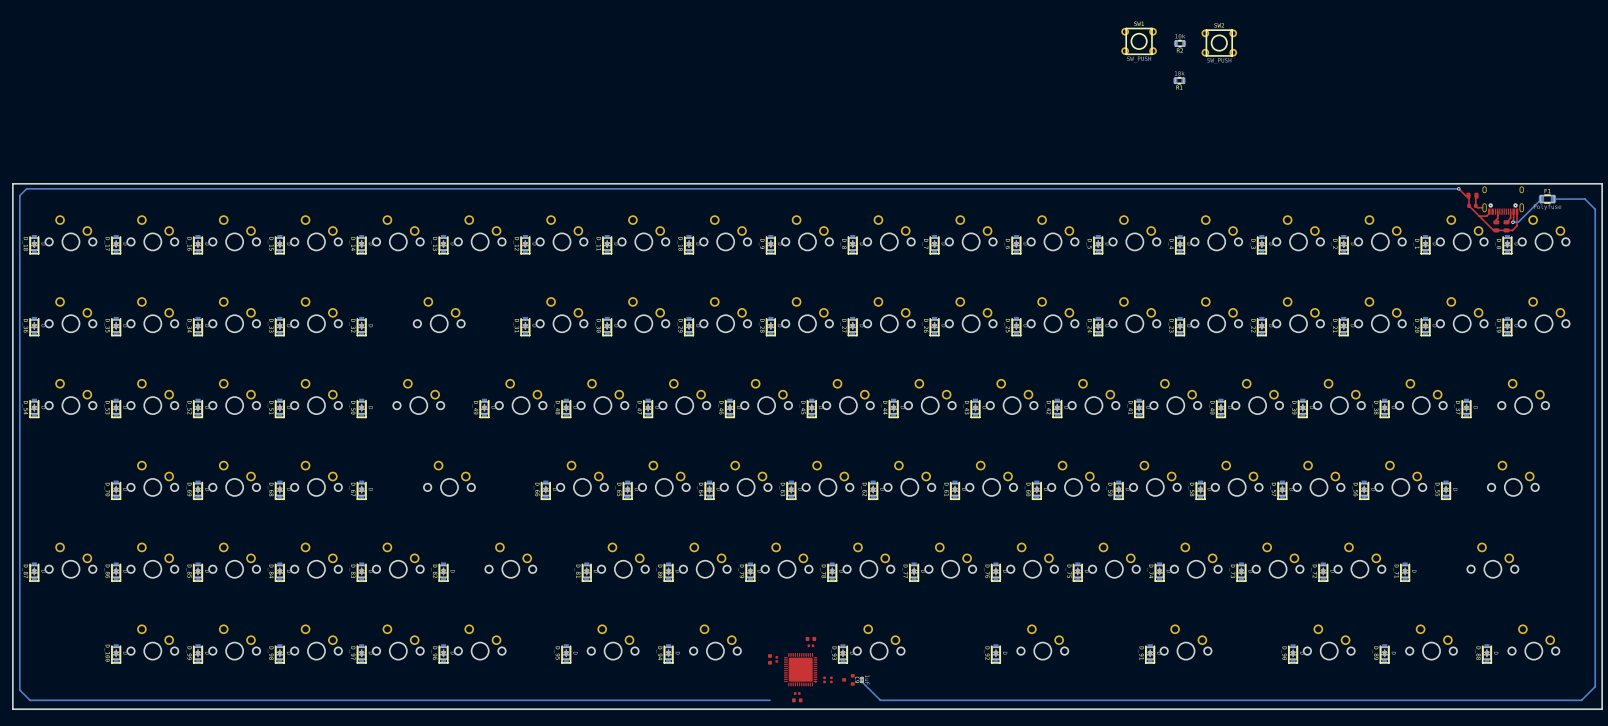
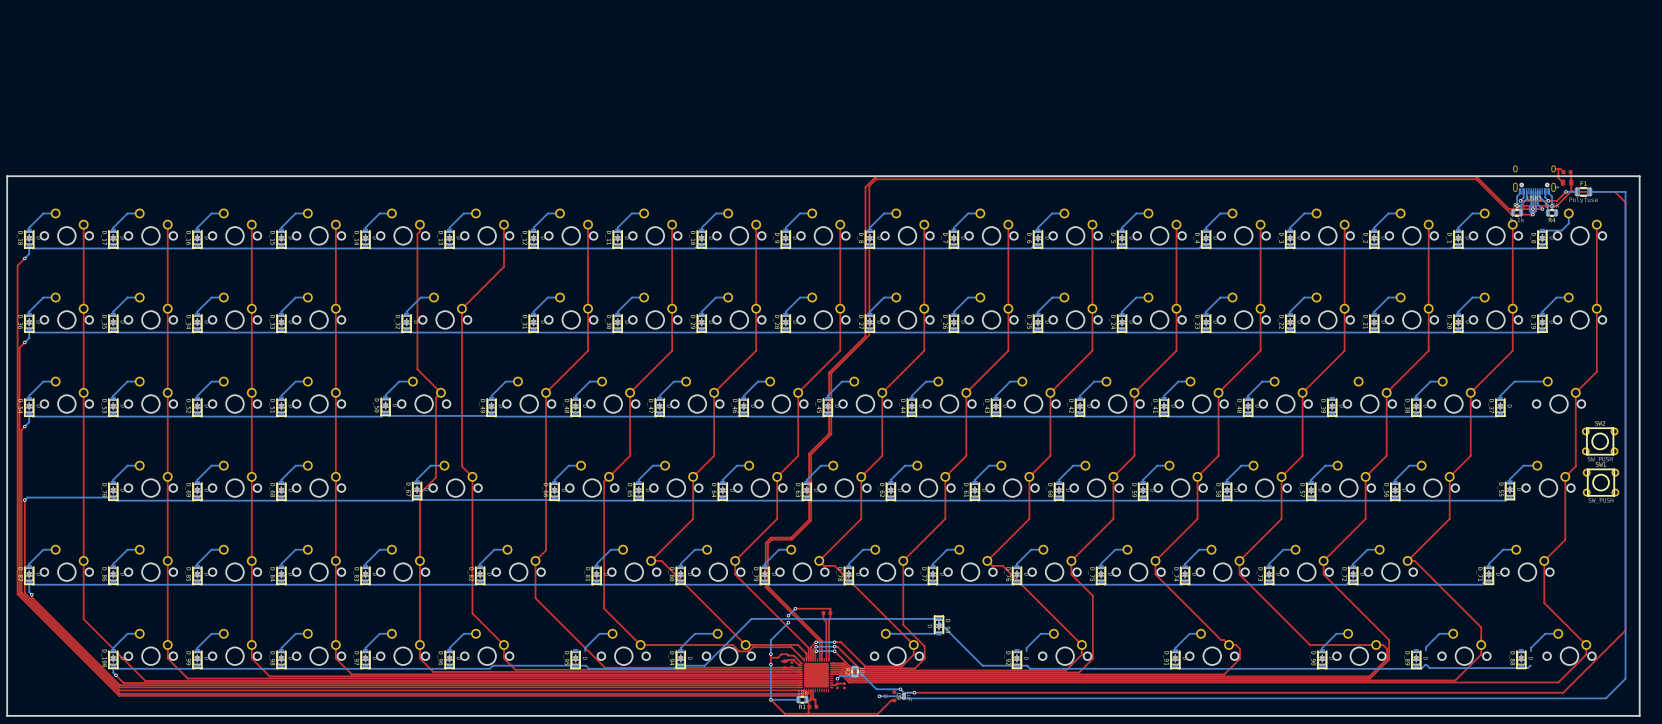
part position: (1139, 41) -> (1601, 482)
part rotation: 0° (1180, 43) -> 90° clockwise (854, 671)
part position: (1180, 43) -> (854, 671)
part position: (1219, 43) -> (1600, 441)
part position: (1179, 80) -> (802, 699)
top track: none -> (1553, 168) (1560, 168) (1563, 172)
top track: none -> (1558, 168) (1558, 178) (1562, 182)
top track: none -> (1570, 172) (1571, 191)
top track: (1458, 188) (1465, 195) (1468, 195) -> none
bottom track: (1458, 188) (26, 188) (19, 195) (19, 690) (30, 700) (770, 700) -> none
via: (1458, 188) -> none
bottom track: none -> (1558, 187) (1553, 187)
top track: (1469, 195) (1469, 205) -> none
part position: (1472, 195) -> (1567, 182)
top track: (1476, 195) (1475, 205) (1484, 207) -> none
bottom track: none -> (1520, 191) (1516, 196) (1516, 208) (1512, 212)
bottom track: none -> (1523, 191) (1523, 197) (1520, 200)
bottom track: none -> (1526, 191) (1526, 199) (1521, 205) (1521, 212)
bottom track: none -> (1533, 191) (1532, 209)
bottom track: none -> (1535, 191) (1536, 210) (1534, 212) (1529, 210) (1531, 191)
bottom track: none -> (1537, 191) (1537, 204) (1542, 209)
bottom track: none -> (1539, 191) (1539, 197) (1547, 204) (1547, 212)
bottom track: none -> (1545, 191) (1545, 197) (1548, 200)
bottom track: none -> (1548, 191) (1551, 196) (1551, 208) (1556, 212)
top track: none -> (1571, 191) (1556, 205) (1516, 205)
top track: none -> (1571, 191) (1615, 191) (1625, 202) (1625, 630) (1563, 692) (914, 692)
top track: none -> (1565, 191) (1557, 200) (1520, 200)
via: none -> (1565, 191)
bottom track: (1541, 199) (1518, 222) (1512, 222) -> (1577, 191) (1565, 191)
bottom track: (1584, 199) (1595, 209) (1595, 686) (1581, 700) (880, 700) (862, 681) -> (1622, 191) (1625, 191) (1625, 678) (1605, 698) (902, 698) (900, 696) (879, 696)
part side: top (1503, 200) -> bottom (1534, 179)
top track: (1469, 205) (1493, 230) (1512, 230) (1516, 225) (1516, 211) -> none
part position: (1472, 205) -> (1567, 172)
via: none -> (1520, 200)
via: none -> (1548, 200)
top track: (1510, 211) (1510, 218) (1506, 222) -> none
top track: (1513, 211) (1512, 222) -> none
via: none -> (1516, 205)
via: none -> (1551, 205)
via: none -> (1532, 209)
top track: none -> (1542, 209) (1508, 209) (1476, 176) (876, 176) (865, 187) (865, 336) (829, 372) (829, 433) (809, 453) (809, 519) (791, 537) (771, 537) (765, 542) (765, 587) (819, 641) (819, 660)
via: none -> (1542, 209)
bottom track: none -> (55, 213) (43, 213) (29, 227) (29, 230)
bottom track: none -> (139, 213) (127, 213) (113, 227) (113, 230)
bottom track: none -> (223, 213) (211, 213) (197, 227) (197, 230)
bottom track: none -> (307, 213) (295, 213) (281, 227) (281, 230)
bottom track: none -> (391, 213) (379, 213) (365, 227) (365, 230)
bottom track: none -> (475, 213) (463, 213) (449, 227) (449, 230)
bottom track: none -> (560, 213) (547, 213) (533, 227) (533, 230)
bottom track: none -> (644, 213) (631, 213) (617, 227) (617, 230)
bottom track: none -> (728, 213) (715, 213) (701, 227) (701, 230)
bottom track: none -> (812, 213) (800, 213) (785, 227) (785, 230)
bottom track: none -> (896, 213) (884, 213) (869, 227) (869, 230)
bottom track: none -> (980, 213) (968, 213) (953, 227) (953, 230)
bottom track: none -> (1064, 213) (1052, 213) (1038, 227) (1038, 230)
bottom track: none -> (1148, 213) (1136, 213) (1122, 227) (1122, 230)
bottom track: none -> (1232, 213) (1220, 213) (1206, 227) (1206, 230)
bottom track: none -> (1316, 213) (1304, 213) (1290, 227) (1290, 230)
bottom track: none -> (1400, 213) (1388, 213) (1374, 227) (1374, 230)
bottom track: none -> (1484, 213) (1472, 213) (1458, 227) (1458, 230)
bottom track: none -> (1568, 213) (1568, 223) (1561, 230) (1542, 230)
top track: none -> (1532, 214) (1511, 214) (1476, 179) (876, 179) (869, 186) (869, 335) (831, 373) (831, 434) (811, 454) (811, 520) (792, 539) (771, 539) (767, 543) (767, 586) (821, 640) (821, 660)
via: none -> (1532, 214)
via: (1512, 222) -> none
part side: top (1496, 226) -> bottom (1551, 212)
part side: top (1506, 226) -> bottom (1516, 212)
top track: none -> (83, 224) (83, 619) (145, 680) (801, 680)
top track: none -> (167, 224) (167, 658) (187, 678) (801, 678)
top track: none -> (251, 224) (251, 658) (269, 676) (801, 676)
top track: none -> (335, 224) (335, 658) (351, 674) (801, 674)
top track: none -> (419, 224) (419, 231) (417, 234) (417, 369) (440, 392) (435, 397) (435, 477) (419, 493) (419, 658) (433, 671) (801, 671)
top track: none -> (503, 224) (503, 266) (461, 308) (461, 466) (472, 476) (472, 613) (503, 644) (503, 658) (515, 669) (801, 669)
top track: none -> (588, 224) (588, 350) (546, 392) (546, 550) (535, 560) (535, 598) (605, 667) (801, 667)
top track: none -> (672, 224) (672, 350) (630, 392) (630, 455) (604, 481) (604, 608) (640, 644) (732, 644) (739, 651) (748, 651) (752, 647) (791, 647) (804, 660)
top track: none -> (756, 224) (756, 350) (714, 392) (714, 455) (693, 476) (693, 518) (651, 560) (661, 560) (745, 644) (797, 644) (806, 653) (806, 660)
top track: none -> (840, 224) (840, 350) (798, 392) (798, 455) (777, 476) (777, 518) (735, 560) (735, 574) (808, 647) (808, 660)
top track: none -> (924, 224) (924, 350) (882, 392) (882, 455) (861, 476) (861, 518) (819, 560) (824, 565) (834, 565) (913, 644) (913, 654) (901, 666) (865, 666) (841, 642) (834, 642)
top track: none -> (1008, 224) (1008, 350) (966, 392) (966, 455) (945, 476) (945, 518) (903, 560) (903, 625) (924, 646) (924, 658) (915, 668) (859, 668) (837, 646) (834, 646)
top track: none -> (1092, 224) (1092, 350) (1050, 392) (1050, 455) (1029, 476) (1029, 518) (987, 560) (992, 565) (1002, 565) (1081, 644) (1081, 654) (1066, 670) (853, 670) (834, 651)
top track: none -> (1176, 224) (1176, 350) (1134, 392) (1134, 455) (1113, 476) (1113, 518) (1071, 560) (1071, 574) (1092, 595) (1092, 658) (1079, 672) (853, 672) (843, 663) (831, 663)
top track: none -> (1260, 224) (1260, 350) (1218, 392) (1218, 455) (1197, 476) (1197, 518) (1155, 560) (1155, 574) (1221, 640) (1224, 640) (1229, 644) (1236, 644) (1239, 648) (1239, 658) (1224, 674) (852, 674) (843, 665) (831, 665)
top track: none -> (1344, 224) (1344, 350) (1302, 392) (1302, 455) (1281, 476) (1281, 518) (1239, 560) (1239, 574) (1310, 644) (1383, 644) (1387, 648) (1387, 658) (1369, 676) (851, 676) (842, 667) (831, 667)
top track: none -> (1428, 224) (1428, 350) (1386, 392) (1386, 455) (1365, 476) (1365, 518) (1323, 560) (1323, 574) (1389, 639) (1389, 659) (1370, 678) (850, 678) (841, 669) (831, 669)
top track: none -> (1512, 224) (1512, 350) (1470, 392) (1470, 455) (1449, 476) (1449, 518) (1407, 560) (1414, 560) (1481, 627) (1481, 654) (1455, 680) (849, 680) (841, 671) (831, 671)
top track: none -> (1596, 224) (1596, 371) (1575, 392) (1575, 466) (1565, 476) (1565, 539) (1544, 560) (1544, 602) (1586, 644) (1586, 654) (1558, 682) (848, 682) (840, 674) (831, 674)
bottom track: none -> (1542, 245) (1538, 248) (1462, 248) (1458, 245) (1454, 245) (1451, 248) (1378, 248) (1374, 245) (1370, 248) (1293, 248) (1290, 245) (1286, 248) (1209, 248) (1206, 245) (1202, 245) (1199, 248) (1125, 248) (1122, 245) (1118, 248) (1041, 248) (1038, 245) (1034, 245) (1031, 248) (957, 248) (954, 245) (950, 248) (873, 248) (870, 245) (866, 248) (789, 248) (786, 245) (782, 248) (705, 248) (702, 245) (697, 245) (694, 248) (621, 248) (618, 245) (613, 248) (537, 248) (534, 245) (529, 248) (453, 248) (450, 245) (445, 248) (369, 248) (366, 245) (361, 248) (285, 248) (282, 245) (277, 248) (201, 248) (198, 245) (193, 248) (117, 248) (113, 245) (109, 248) (33, 248) (29, 245) (29, 254) (24, 258)
top track: none -> (24, 258) (17, 265) (17, 594) (119, 695) (806, 695) (808, 690)
via: none -> (24, 258)
bottom track: none -> (55, 297) (43, 297) (29, 311) (29, 314)
bottom track: none -> (139, 297) (127, 297) (113, 311) (113, 314)
bottom track: none -> (223, 297) (211, 297) (197, 311) (197, 314)
bottom track: none -> (307, 297) (295, 297) (281, 311) (281, 314)
bottom track: none -> (433, 297) (420, 297) (406, 311) (406, 314)
bottom track: none -> (560, 297) (547, 297) (533, 311) (533, 314)
bottom track: none -> (644, 297) (631, 297) (617, 311) (617, 314)
bottom track: none -> (728, 297) (715, 297) (701, 311) (701, 314)
bottom track: none -> (812, 297) (800, 297) (785, 311) (785, 314)
bottom track: none -> (896, 297) (884, 297) (869, 311) (869, 314)
bottom track: none -> (980, 297) (968, 297) (953, 311) (953, 314)
bottom track: none -> (1064, 297) (1052, 297) (1038, 311) (1038, 314)
bottom track: none -> (1148, 297) (1136, 297) (1122, 311) (1122, 314)
bottom track: none -> (1232, 297) (1220, 297) (1206, 311) (1206, 314)
bottom track: none -> (1316, 297) (1304, 297) (1290, 311) (1290, 314)
bottom track: none -> (1400, 297) (1388, 297) (1374, 311) (1374, 314)
bottom track: none -> (1484, 297) (1472, 297) (1458, 311) (1458, 314)
bottom track: none -> (1568, 297) (1556, 297) (1542, 311) (1542, 314)
part position: (361, 326) -> (406, 322)
bottom track: none -> (1542, 329) (1538, 332) (1462, 332) (1458, 329) (1454, 332) (1378, 332) (1374, 329) (1370, 332) (1293, 332) (1290, 329) (1286, 332) (1209, 332) (1206, 329) (1202, 332) (1125, 332) (1122, 329) (1118, 332) (1041, 332) (1038, 329) (1034, 332) (957, 332) (954, 329) (950, 332) (873, 332) (870, 329) (866, 332) (789, 332) (786, 329) (782, 332) (705, 332) (702, 329) (697, 332) (621, 332) (618, 329) (613, 332) (537, 332) (534, 329) (529, 332) (410, 332) (407, 329) (402, 332) (285, 332) (282, 329) (277, 332) (201, 332) (198, 329) (193, 332) (117, 332) (113, 329) (109, 332) (33, 332) (29, 329) (29, 338) (24, 342)
top track: none -> (24, 342) (19, 347) (19, 593) (119, 693) (805, 693) (806, 690)
via: none -> (24, 342)
bottom track: none -> (55, 381) (43, 381) (29, 395) (29, 398)
bottom track: none -> (139, 381) (127, 381) (113, 395) (113, 398)
bottom track: none -> (223, 381) (211, 381) (197, 395) (197, 398)
bottom track: none -> (307, 381) (295, 381) (281, 395) (281, 398)
bottom track: none -> (412, 381) (399, 381) (385, 395) (385, 398)
bottom track: none -> (518, 381) (505, 381) (491, 395) (491, 398)
bottom track: none -> (602, 381) (589, 381) (575, 395) (575, 398)
bottom track: none -> (686, 381) (673, 381) (659, 395) (659, 398)
bottom track: none -> (770, 381) (758, 381) (743, 395) (743, 398)
bottom track: none -> (854, 381) (842, 381) (827, 395) (827, 398)
bottom track: none -> (938, 381) (926, 381) (911, 395) (911, 398)
bottom track: none -> (1022, 381) (1010, 381) (995, 395) (995, 398)
bottom track: none -> (1106, 381) (1094, 381) (1080, 395) (1080, 398)
bottom track: none -> (1190, 381) (1178, 381) (1164, 395) (1164, 398)
bottom track: none -> (1274, 381) (1262, 381) (1248, 395) (1248, 398)
bottom track: none -> (1442, 381) (1430, 381) (1416, 395) (1416, 398)
bottom track: none -> (1547, 381) (1514, 381) (1500, 395) (1500, 398)
part position: (361, 408) -> (385, 406)
bottom track: none -> (1500, 413) (1496, 416) (1420, 416) (1416, 413) (1412, 416) (1335, 416) (1332, 413) (1328, 416) (1251, 416) (1248, 413) (1244, 416) (1167, 416) (1164, 413) (1160, 416) (1083, 416) (1080, 413) (1076, 416) (999, 416) (996, 413) (992, 416) (915, 416) (912, 413) (908, 416) (831, 416) (828, 413) (824, 416) (747, 416) (744, 413) (740, 416) (663, 416) (660, 413) (655, 416) (579, 416) (576, 413) (571, 416) (495, 416) (492, 413) (488, 415) (389, 415) (386, 412) (381, 416) (285, 416) (282, 413) (277, 416) (201, 416) (198, 413) (193, 416) (117, 416) (113, 413) (109, 416) (33, 416) (29, 413) (29, 422) (24, 426)
top track: none -> (24, 426) (21, 429) (21, 592) (119, 690) (804, 690)
via: none -> (24, 426)
bottom track: none -> (139, 465) (127, 465) (113, 479) (113, 483)
bottom track: none -> (223, 465) (211, 465) (197, 479) (197, 483)
bottom track: none -> (307, 465) (295, 465) (281, 479) (281, 483)
bottom track: none -> (444, 465) (430, 465) (417, 479) (417, 482)
bottom track: none -> (581, 465) (568, 465) (554, 479) (554, 483)
bottom track: none -> (665, 465) (652, 465) (638, 479) (638, 483)
bottom track: none -> (749, 465) (737, 465) (722, 479) (722, 483)
bottom track: none -> (833, 465) (821, 465) (806, 479) (806, 483)
bottom track: none -> (917, 465) (905, 465) (890, 479) (890, 483)
bottom track: none -> (1001, 465) (989, 465) (974, 479) (974, 483)
bottom track: none -> (1085, 465) (1073, 465) (1059, 479) (1059, 483)
bottom track: none -> (1169, 465) (1157, 465) (1143, 479) (1143, 483)
bottom track: none -> (1253, 465) (1241, 465) (1227, 479) (1227, 483)
bottom track: none -> (1337, 465) (1325, 465) (1311, 479) (1311, 483)
bottom track: none -> (1421, 465) (1409, 465) (1395, 479) (1395, 483)
bottom track: none -> (1537, 465) (1523, 465) (1509, 479) (1509, 482)
part position: (361, 490) -> (417, 490)
part position: (1446, 490) -> (1509, 490)
bottom track: none -> (1509, 496) (1505, 500) (1399, 500) (1395, 497) (1391, 500) (1314, 500) (1311, 497) (1307, 500) (1230, 500) (1227, 497) (1223, 500) (1146, 500) (1143, 497) (1139, 500) (1062, 500) (1059, 497) (1055, 500) (978, 500) (975, 497) (971, 500) (894, 500) (891, 497) (887, 500) (810, 500) (807, 497) (803, 500) (726, 500) (723, 497) (719, 500) (642, 500) (639, 497) (634, 500) (558, 500) (555, 497) (551, 500) (420, 500) (417, 496) (412, 500) (285, 500) (282, 497) (277, 500) (201, 500) (198, 497) (193, 500) (117, 500) (113, 497) (27, 497) (24, 500)
top track: none -> (24, 500) (24, 593) (119, 687) (801, 687)
via: none -> (24, 500)
bottom track: none -> (55, 549) (43, 549) (29, 563) (29, 567)
bottom track: none -> (139, 549) (127, 549) (113, 563) (113, 567)
bottom track: none -> (223, 549) (211, 549) (197, 563) (197, 567)
bottom track: none -> (307, 549) (295, 549) (281, 563) (281, 567)
bottom track: none -> (391, 549) (379, 549) (365, 563) (365, 567)
bottom track: none -> (507, 549) (494, 549) (480, 563) (480, 567)
bottom track: none -> (623, 549) (610, 549) (596, 563) (596, 567)
bottom track: none -> (707, 549) (694, 549) (680, 563) (680, 567)
bottom track: none -> (791, 549) (779, 549) (764, 563) (764, 567)
bottom track: none -> (875, 549) (863, 549) (848, 563) (848, 567)
bottom track: none -> (959, 549) (947, 549) (932, 563) (932, 567)
bottom track: none -> (1043, 549) (1031, 549) (1016, 563) (1016, 567)
bottom track: none -> (1127, 549) (1115, 549) (1101, 563) (1101, 567)
bottom track: none -> (1211, 549) (1199, 549) (1185, 563) (1185, 567)
bottom track: none -> (1295, 549) (1283, 549) (1269, 563) (1269, 567)
bottom track: none -> (1379, 549) (1367, 549) (1353, 563) (1353, 567)
bottom track: none -> (1516, 549) (1503, 549) (1488, 563) (1488, 567)
part position: (443, 571) -> (480, 574)
part position: (1405, 571) -> (1488, 574)
bottom track: none -> (1488, 581) (1485, 581) (1482, 584) (1357, 584) (1353, 581) (1349, 581) (1346, 584) (1272, 584) (1269, 581) (1265, 584) (1188, 584) (1185, 581) (1181, 584) (1104, 584) (1101, 581) (1097, 584) (1020, 584) (1017, 581) (1013, 584) (936, 584) (933, 581) (929, 584) (852, 584) (849, 581) (845, 584) (768, 584) (765, 581) (761, 584) (684, 584) (681, 581) (676, 584) (600, 584) (597, 581) (592, 584) (483, 584) (480, 581) (476, 584) (369, 584) (366, 581) (361, 584) (285, 584) (282, 581) (277, 584) (201, 584) (198, 581) (193, 584) (117, 584) (113, 581) (109, 584) (33, 584) (29, 581) (29, 592) (31, 594)
top track: none -> (31, 594) (31, 597) (119, 685) (801, 685)
via: none -> (31, 594)
top track: none -> (795, 608) (830, 608) (828, 660)
bottom track: none -> (795, 608) (788, 615)
via: none -> (795, 608)
top track: none -> (823, 613) (823, 618) (826, 621) (826, 660)
via: none -> (788, 615)
bottom track: none -> (788, 622) (770, 640) (770, 654)
via: none -> (788, 622)
bottom track: none -> (939, 633) (885, 633)
bottom track: none -> (139, 633) (127, 633) (113, 648) (113, 651)
bottom track: none -> (223, 633) (211, 633) (197, 648) (197, 651)
bottom track: none -> (307, 633) (295, 633) (281, 648) (281, 651)
bottom track: none -> (391, 633) (379, 633) (365, 648) (365, 651)
bottom track: none -> (475, 633) (463, 633) (449, 648) (449, 651)
bottom track: none -> (612, 633) (599, 633) (585, 648) (585, 651)
bottom track: none -> (717, 633) (694, 633) (680, 648) (680, 651)
bottom track: none -> (1053, 633) (1040, 633) (1026, 648) (1026, 651)
bottom track: none -> (1201, 633) (1189, 633) (1175, 648) (1175, 651)
bottom track: none -> (1348, 633) (1336, 633) (1322, 648) (1322, 651)
bottom track: none -> (1453, 633) (1439, 633) (1425, 647) (1425, 650)
bottom track: none -> (1558, 633) (1545, 633) (1530, 648) (1530, 651)
top track: none -> (816, 642) (810, 647) (810, 660)
via: none -> (816, 642)
bottom track: none -> (834, 642) (816, 642)
via: none -> (834, 642)
part position: (810, 638) -> (826, 613)
top track: none -> (816, 646) (813, 649) (813, 660)
via: none -> (816, 646)
bottom track: none -> (834, 646) (816, 646)
via: none -> (834, 646)
part: (810, 645) -> none
top track: none -> (816, 651) (815, 660)
via: none -> (816, 651)
bottom track: none -> (834, 651) (816, 651)
via: none -> (834, 651)
top track: none -> (770, 654) (770, 664)
via: none -> (770, 654)
top track: none -> (770, 657) (787, 654) (793, 655) (801, 663)
part rotation: 0° (842, 653) -> 180° (939, 625)
part position: (842, 653) -> (939, 625)
top track: none -> (781, 661) (793, 659) (801, 665)
bottom track: none -> (770, 664) (770, 699) (798, 699)
via: none -> (770, 664)
bottom track: none -> (1530, 665) (1527, 668) (1429, 668) (1425, 665) (1421, 668) (1325, 668) (1322, 665) (1318, 668) (1179, 668) (1176, 665) (1171, 668) (1030, 668) (1027, 665) (982, 665) (939, 622) (939, 618) (751, 618) (704, 665) (676, 665) (673, 668) (589, 668) (585, 665) (492, 665) (489, 668) (453, 668) (450, 665) (445, 668) (369, 668) (366, 665) (361, 668) (285, 668) (282, 665) (277, 668) (201, 668) (196, 665) (193, 668) (117, 668) (113, 665) (113, 672) (115, 675)
bottom track: none -> (854, 667) (876, 689) (900, 689) (903, 694) (914, 692)
top track: none -> (115, 675) (123, 682) (801, 682)
via: none -> (115, 675)
bottom track: none -> (854, 675) (840, 675) (837, 678)
via: none -> (837, 678)
top track: none -> (844, 683) (831, 685)
part: none -> (837, 685)
part: (824, 679) -> none
part: none -> (844, 685)
part: (831, 679) -> none
part position: (848, 679) -> (889, 696)
part position: (862, 679) -> (903, 696)
via: none -> (900, 689)
top track: none -> (810, 690) (810, 698) (808, 701) (809, 713)
top track: none -> (813, 690) (815, 706)
via: none -> (914, 692)
via: none -> (879, 696)
top track: none -> (770, 699) (784, 713) (877, 713) (891, 700) (894, 700)
via: none -> (770, 699)

